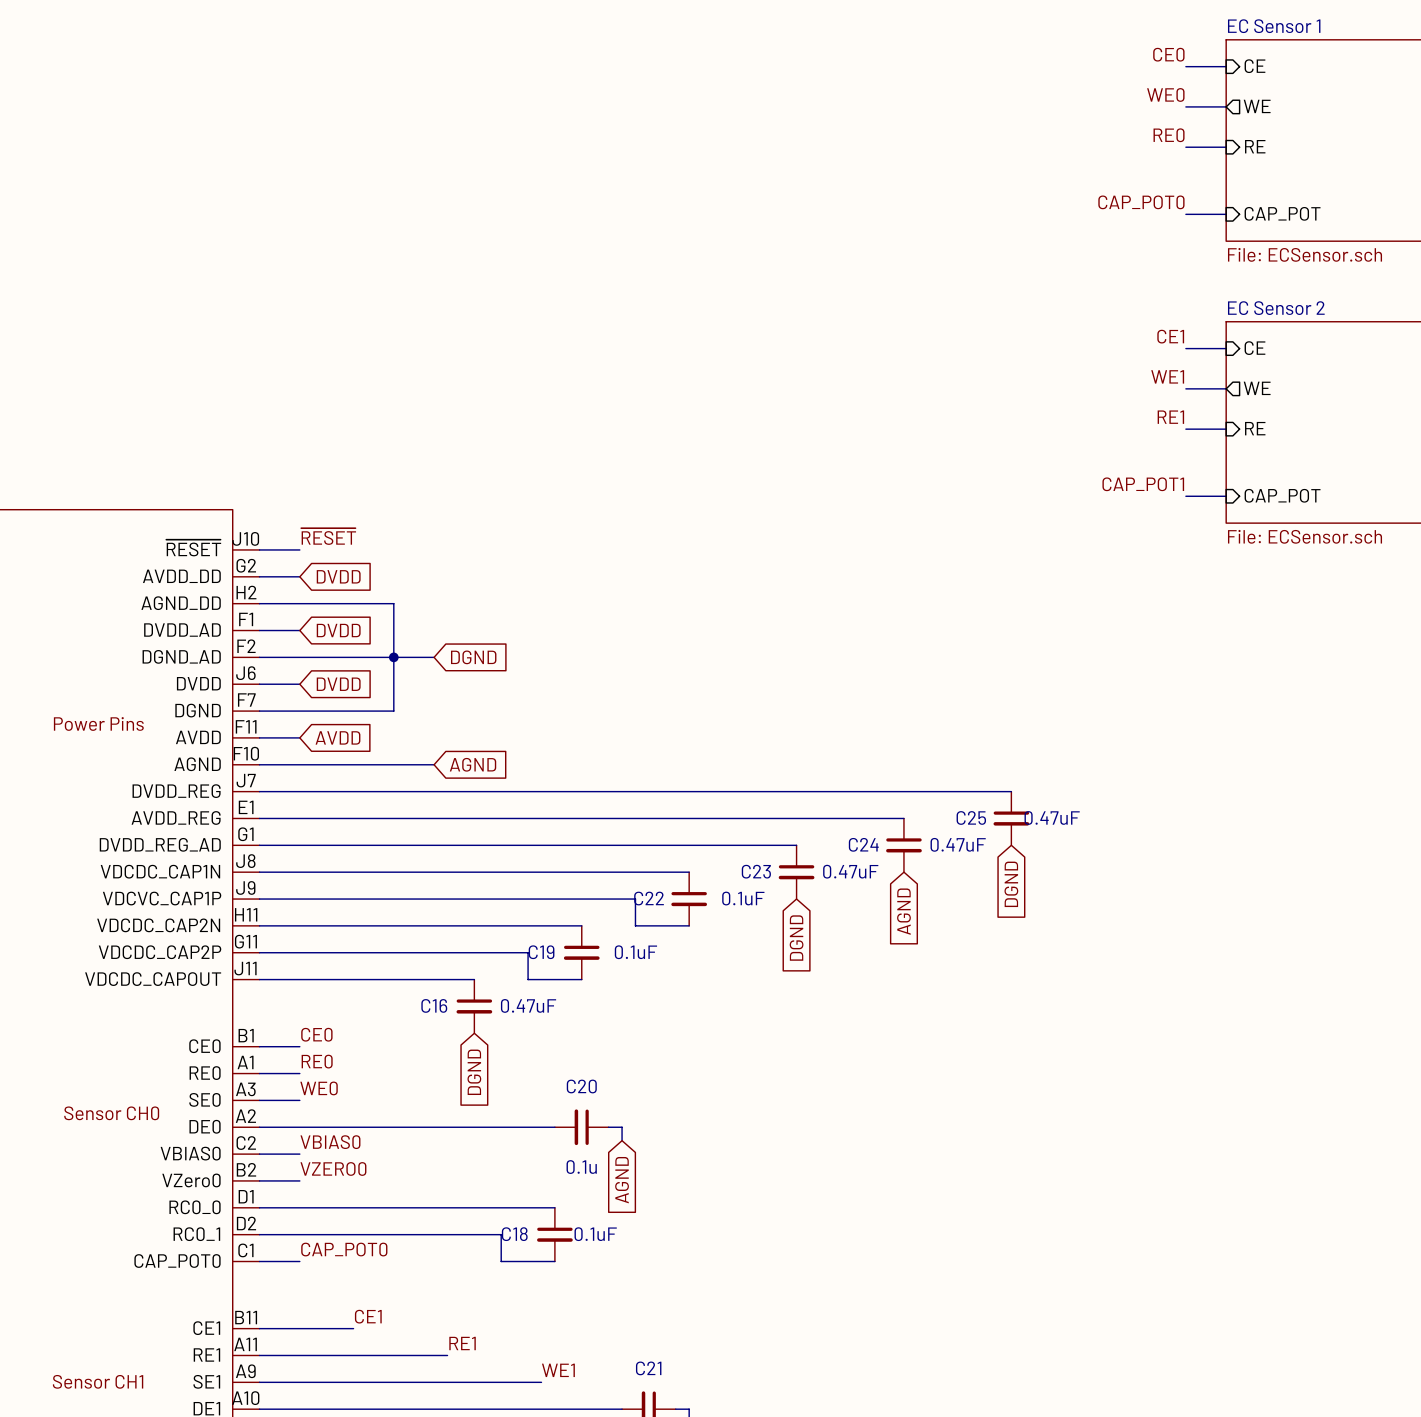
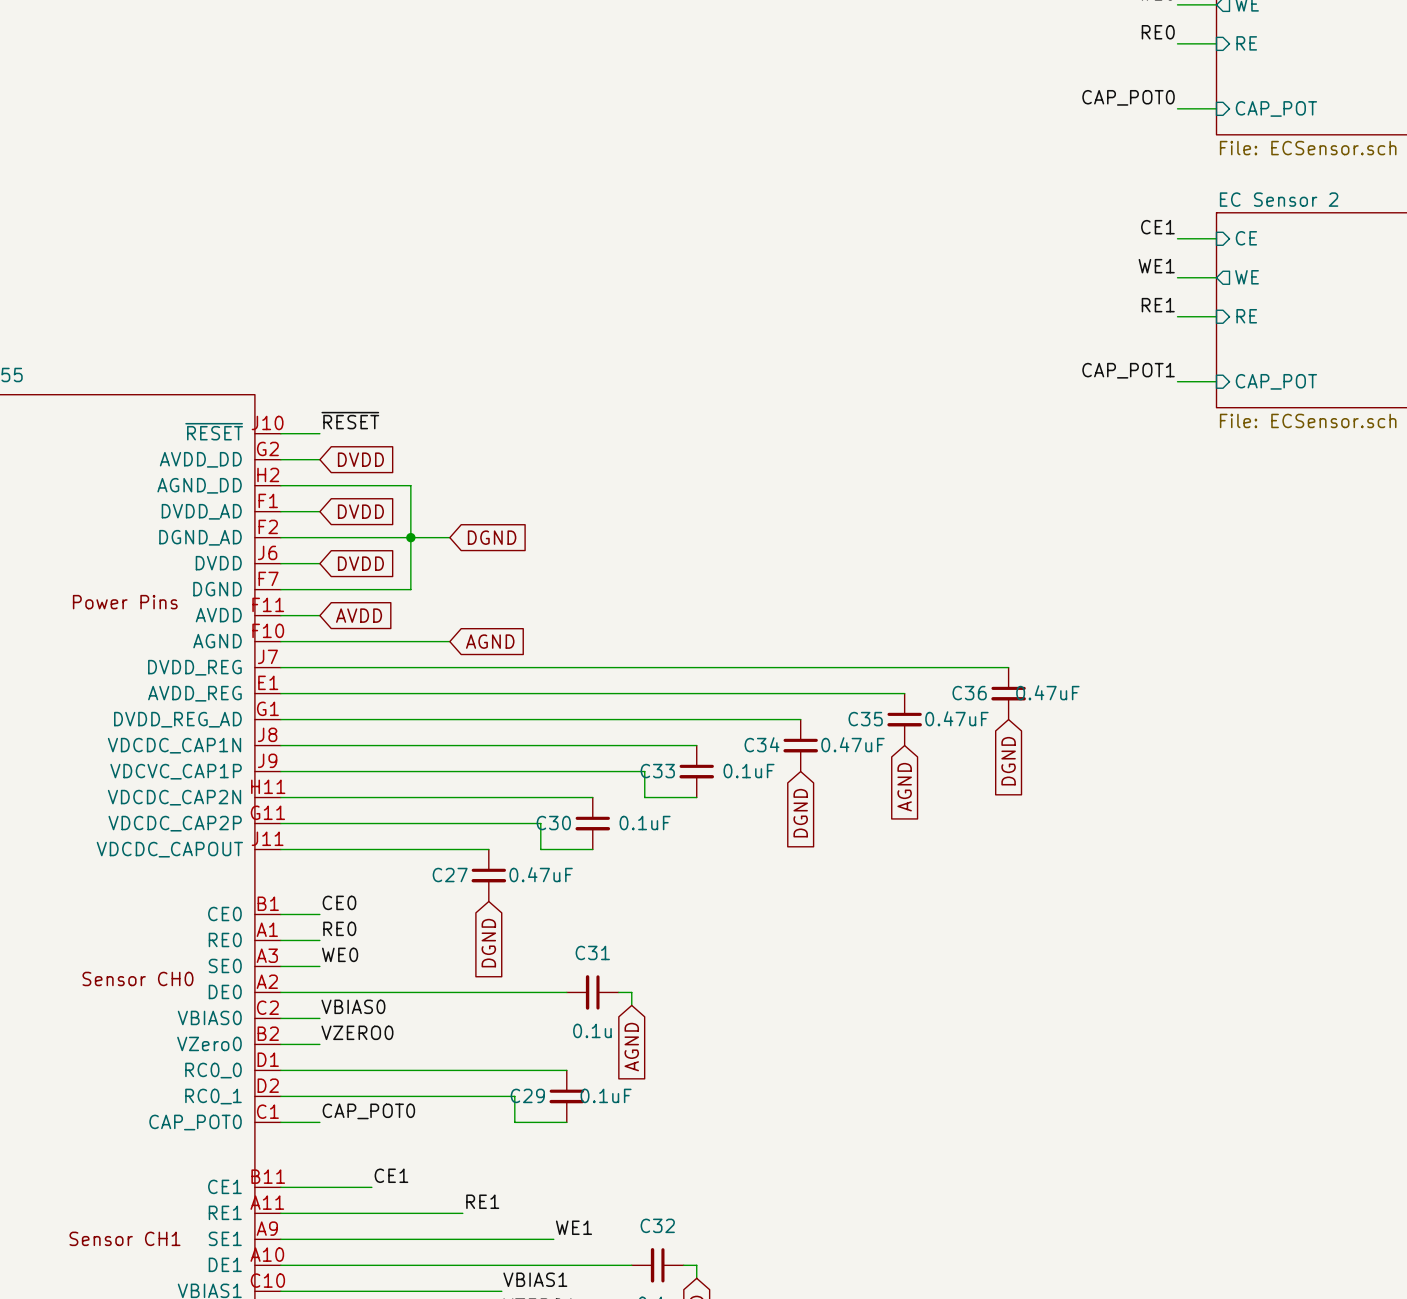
C25 name: C25 (971, 817) -> C36 (969, 693)
C24 name: C24 (863, 844) -> C35 (865, 719)
C23 name: C23 (756, 871) -> C34 (762, 744)
C22 name: C22 (649, 898) -> C33 (657, 771)
C19 name: C19 (541, 952) -> C30 (553, 823)
C16 name: C16 (434, 1005) -> C27 (450, 875)
C20 name: C20 (581, 1086) -> C31 (592, 952)
C18 name: C18 (514, 1234) -> C29 (527, 1095)
C21 name: C21 (648, 1368) -> C32 (657, 1225)

